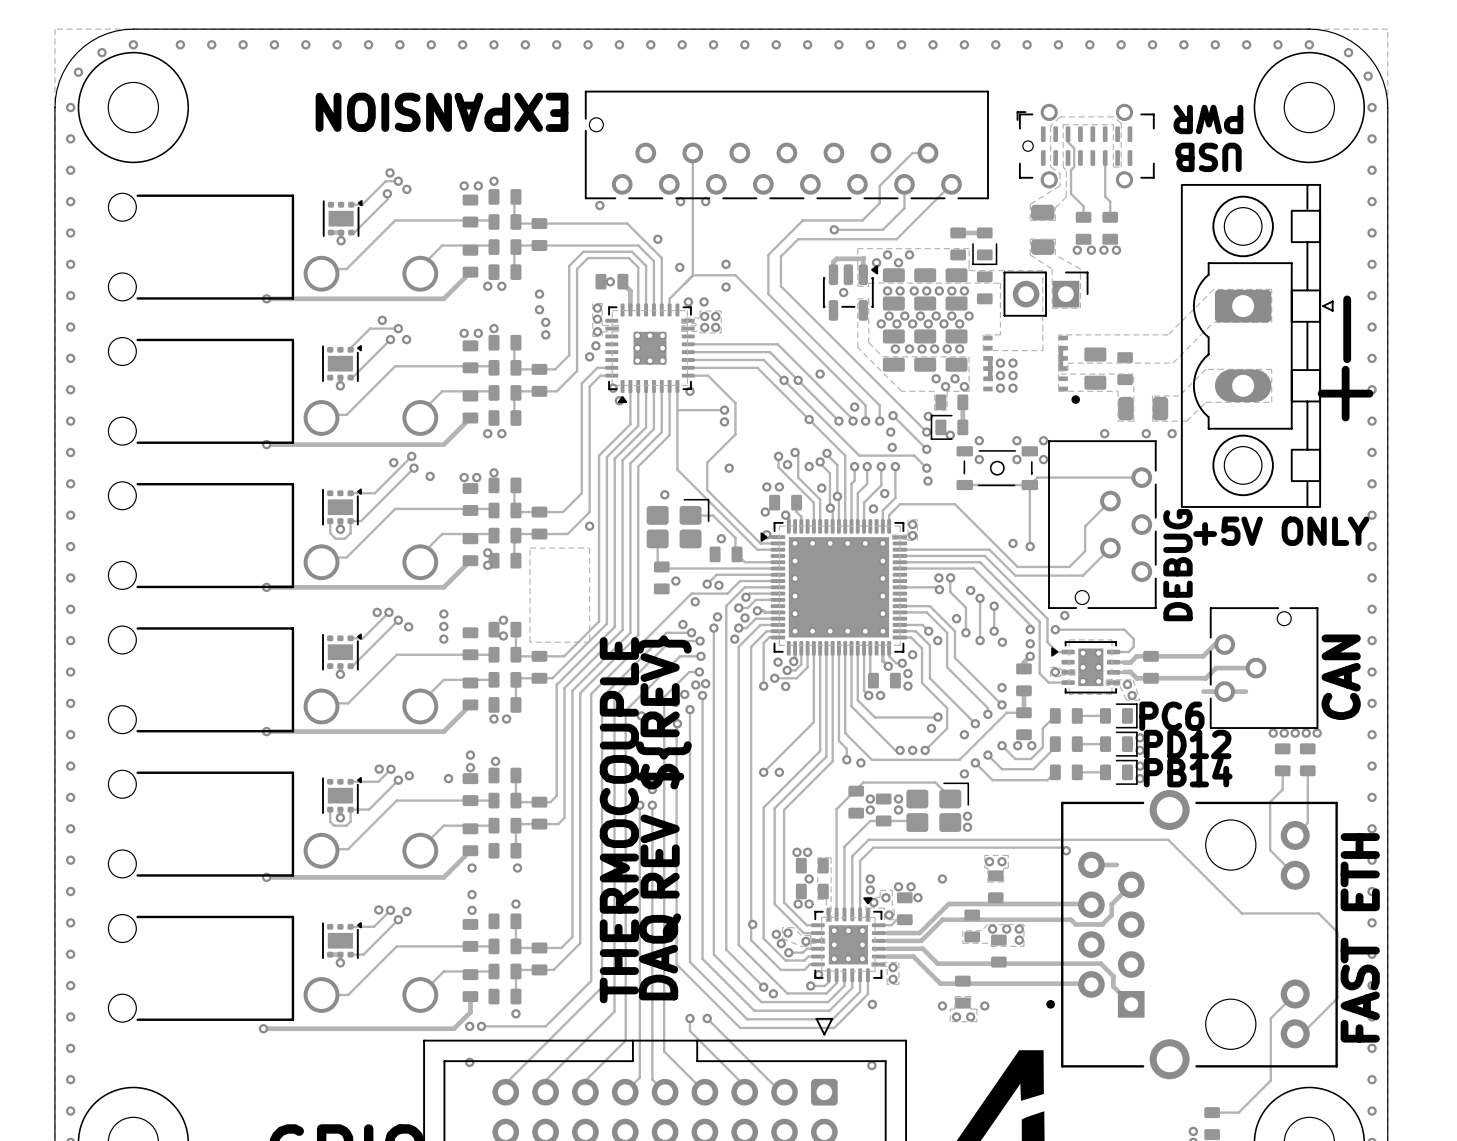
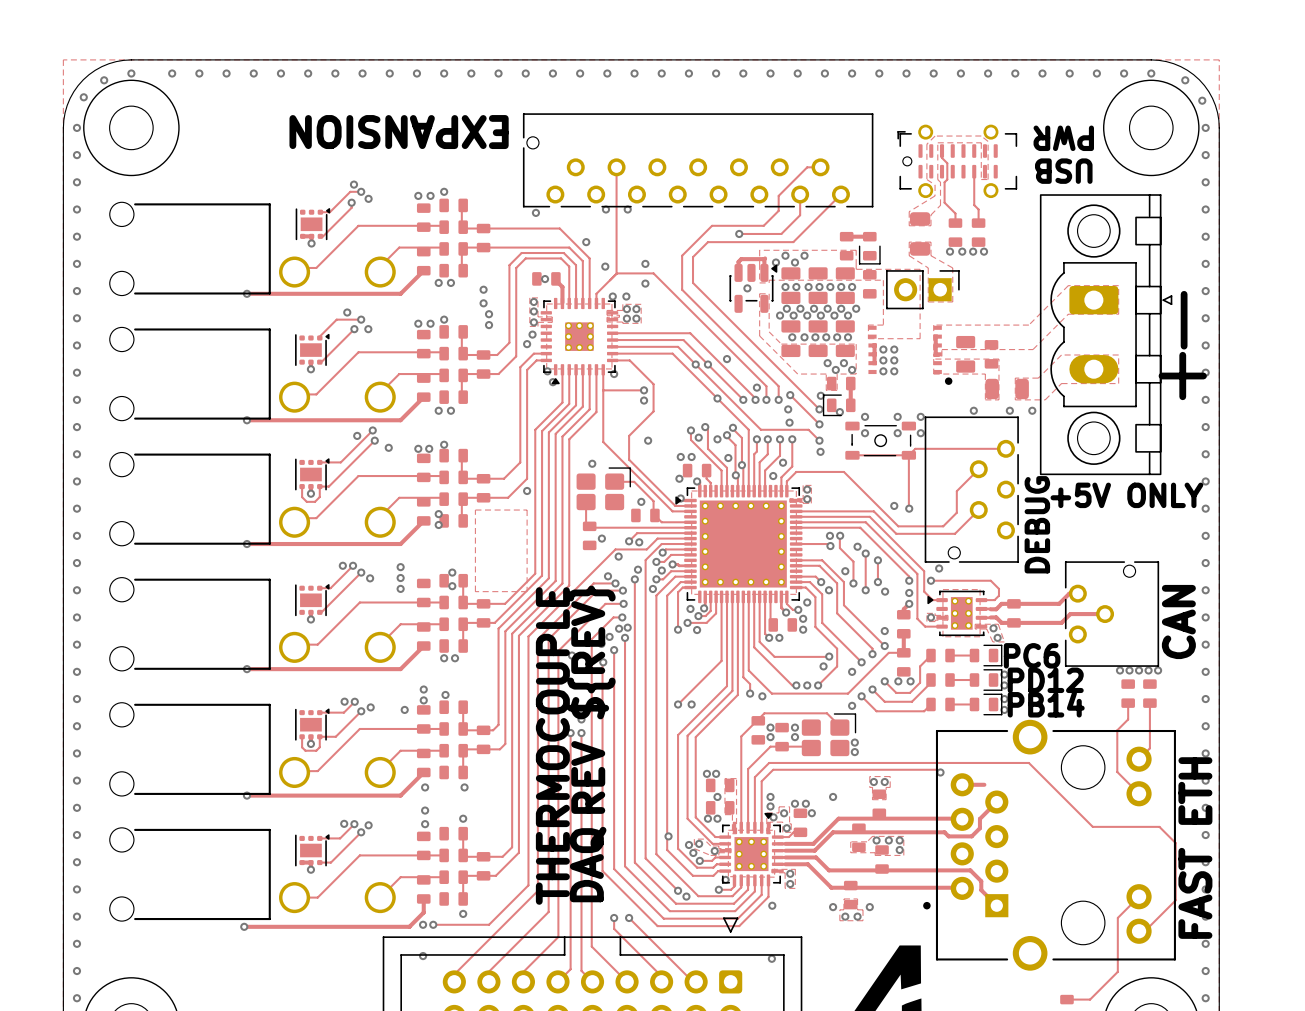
track: (1203, 691) (1245, 691) -> none

